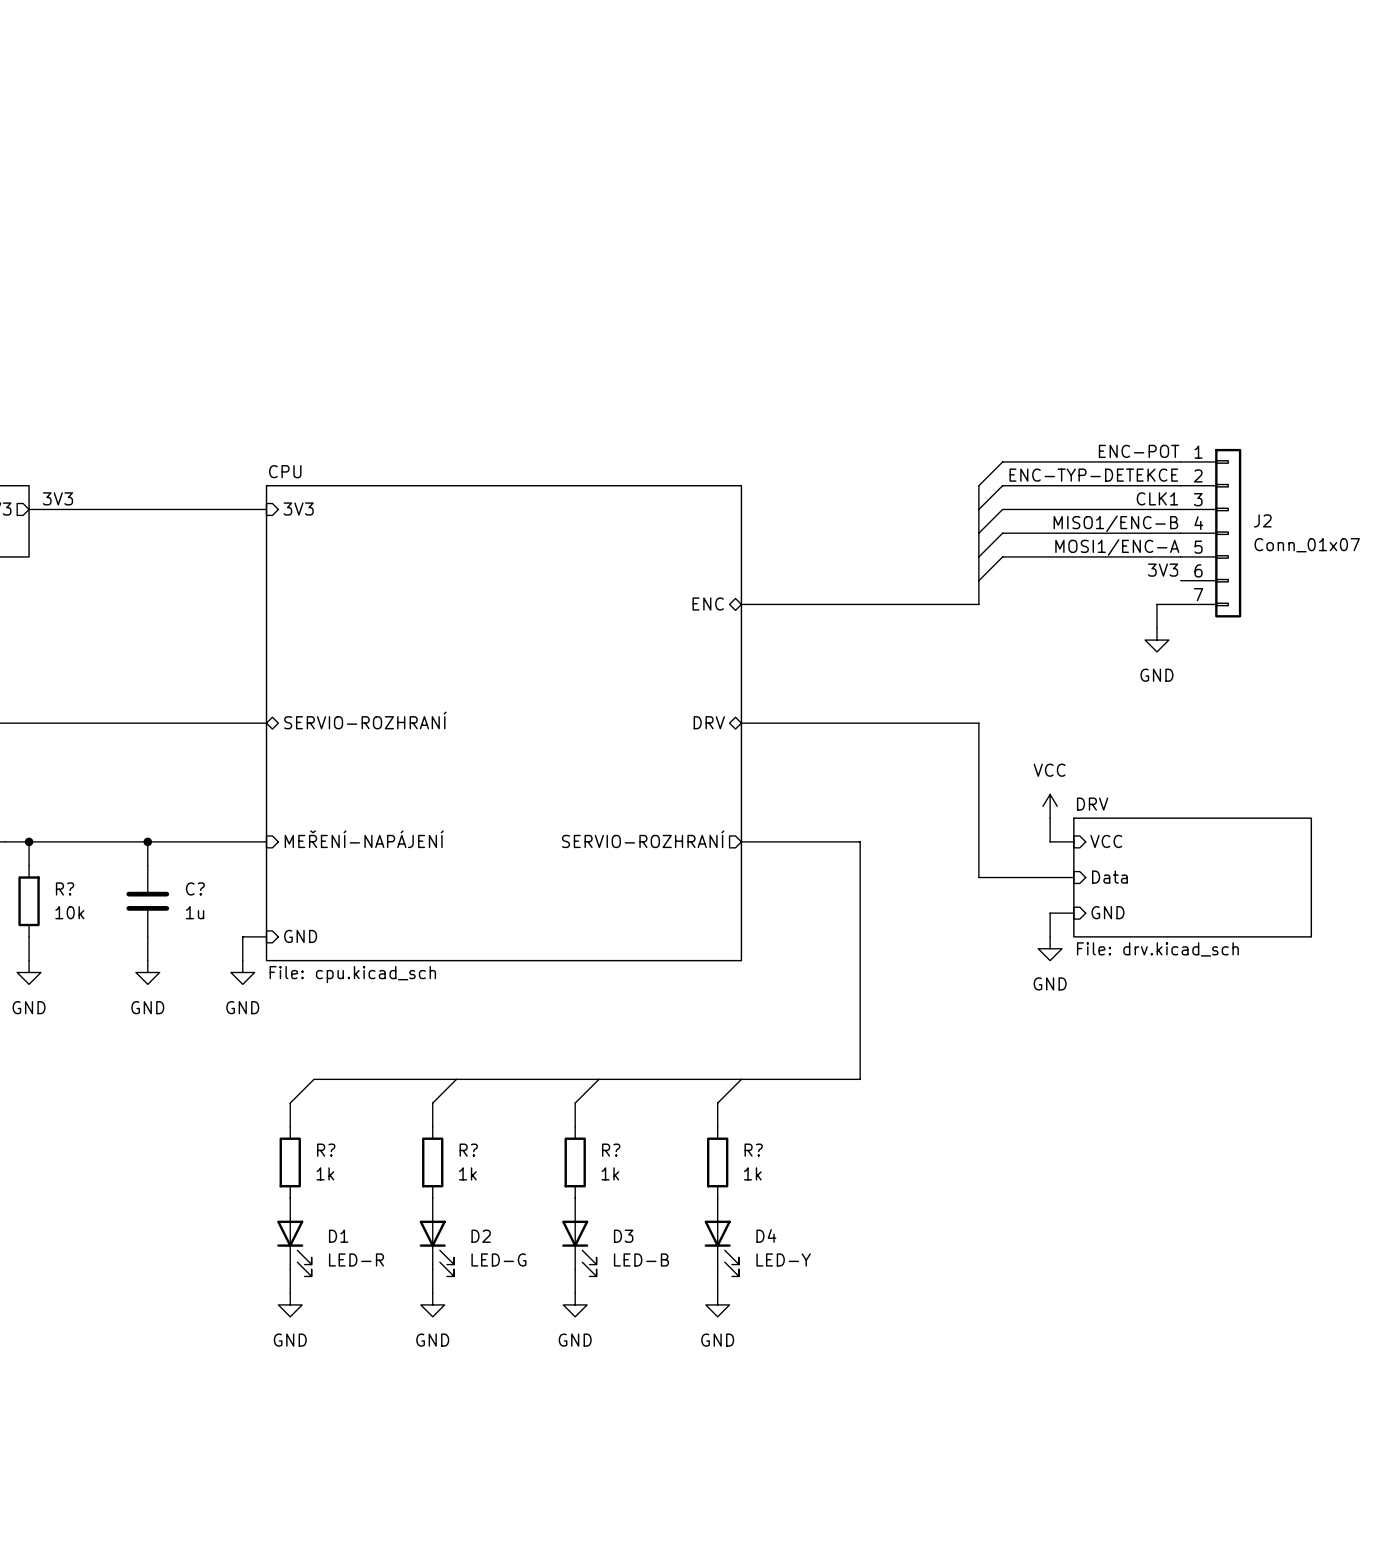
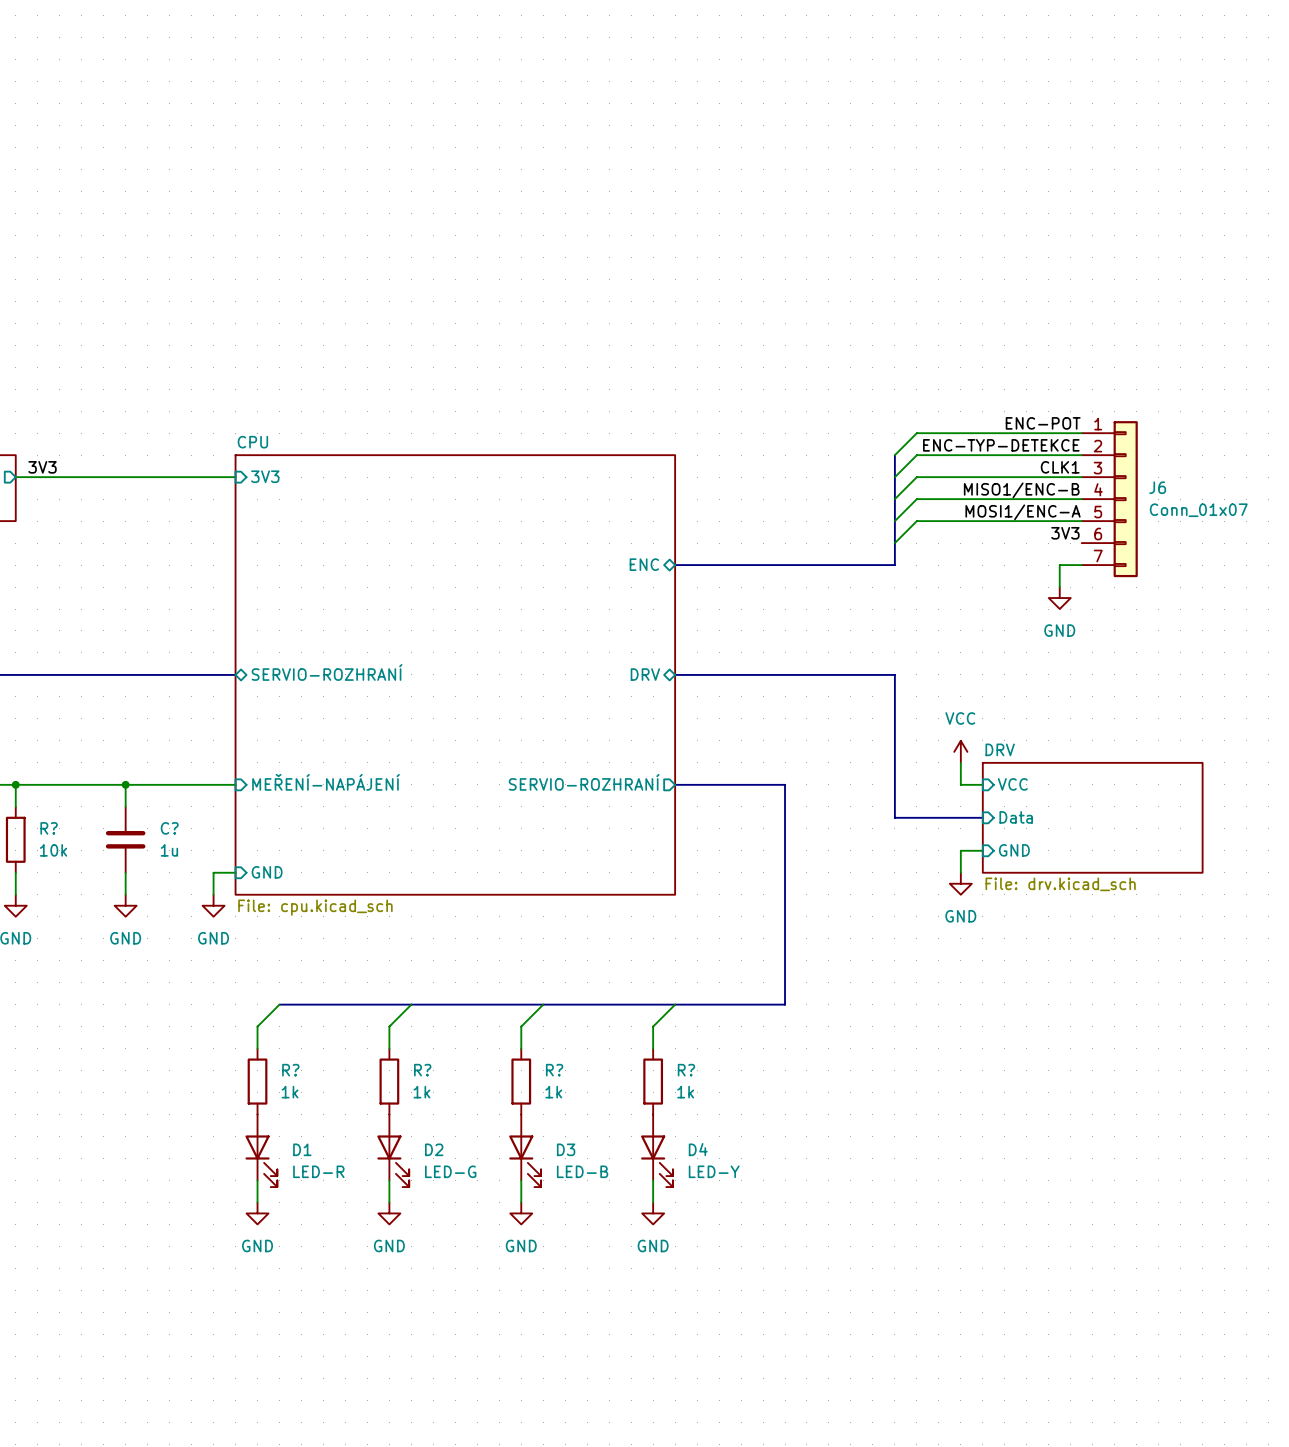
J2 name: J2 (1262, 520) -> J6 (1157, 487)

